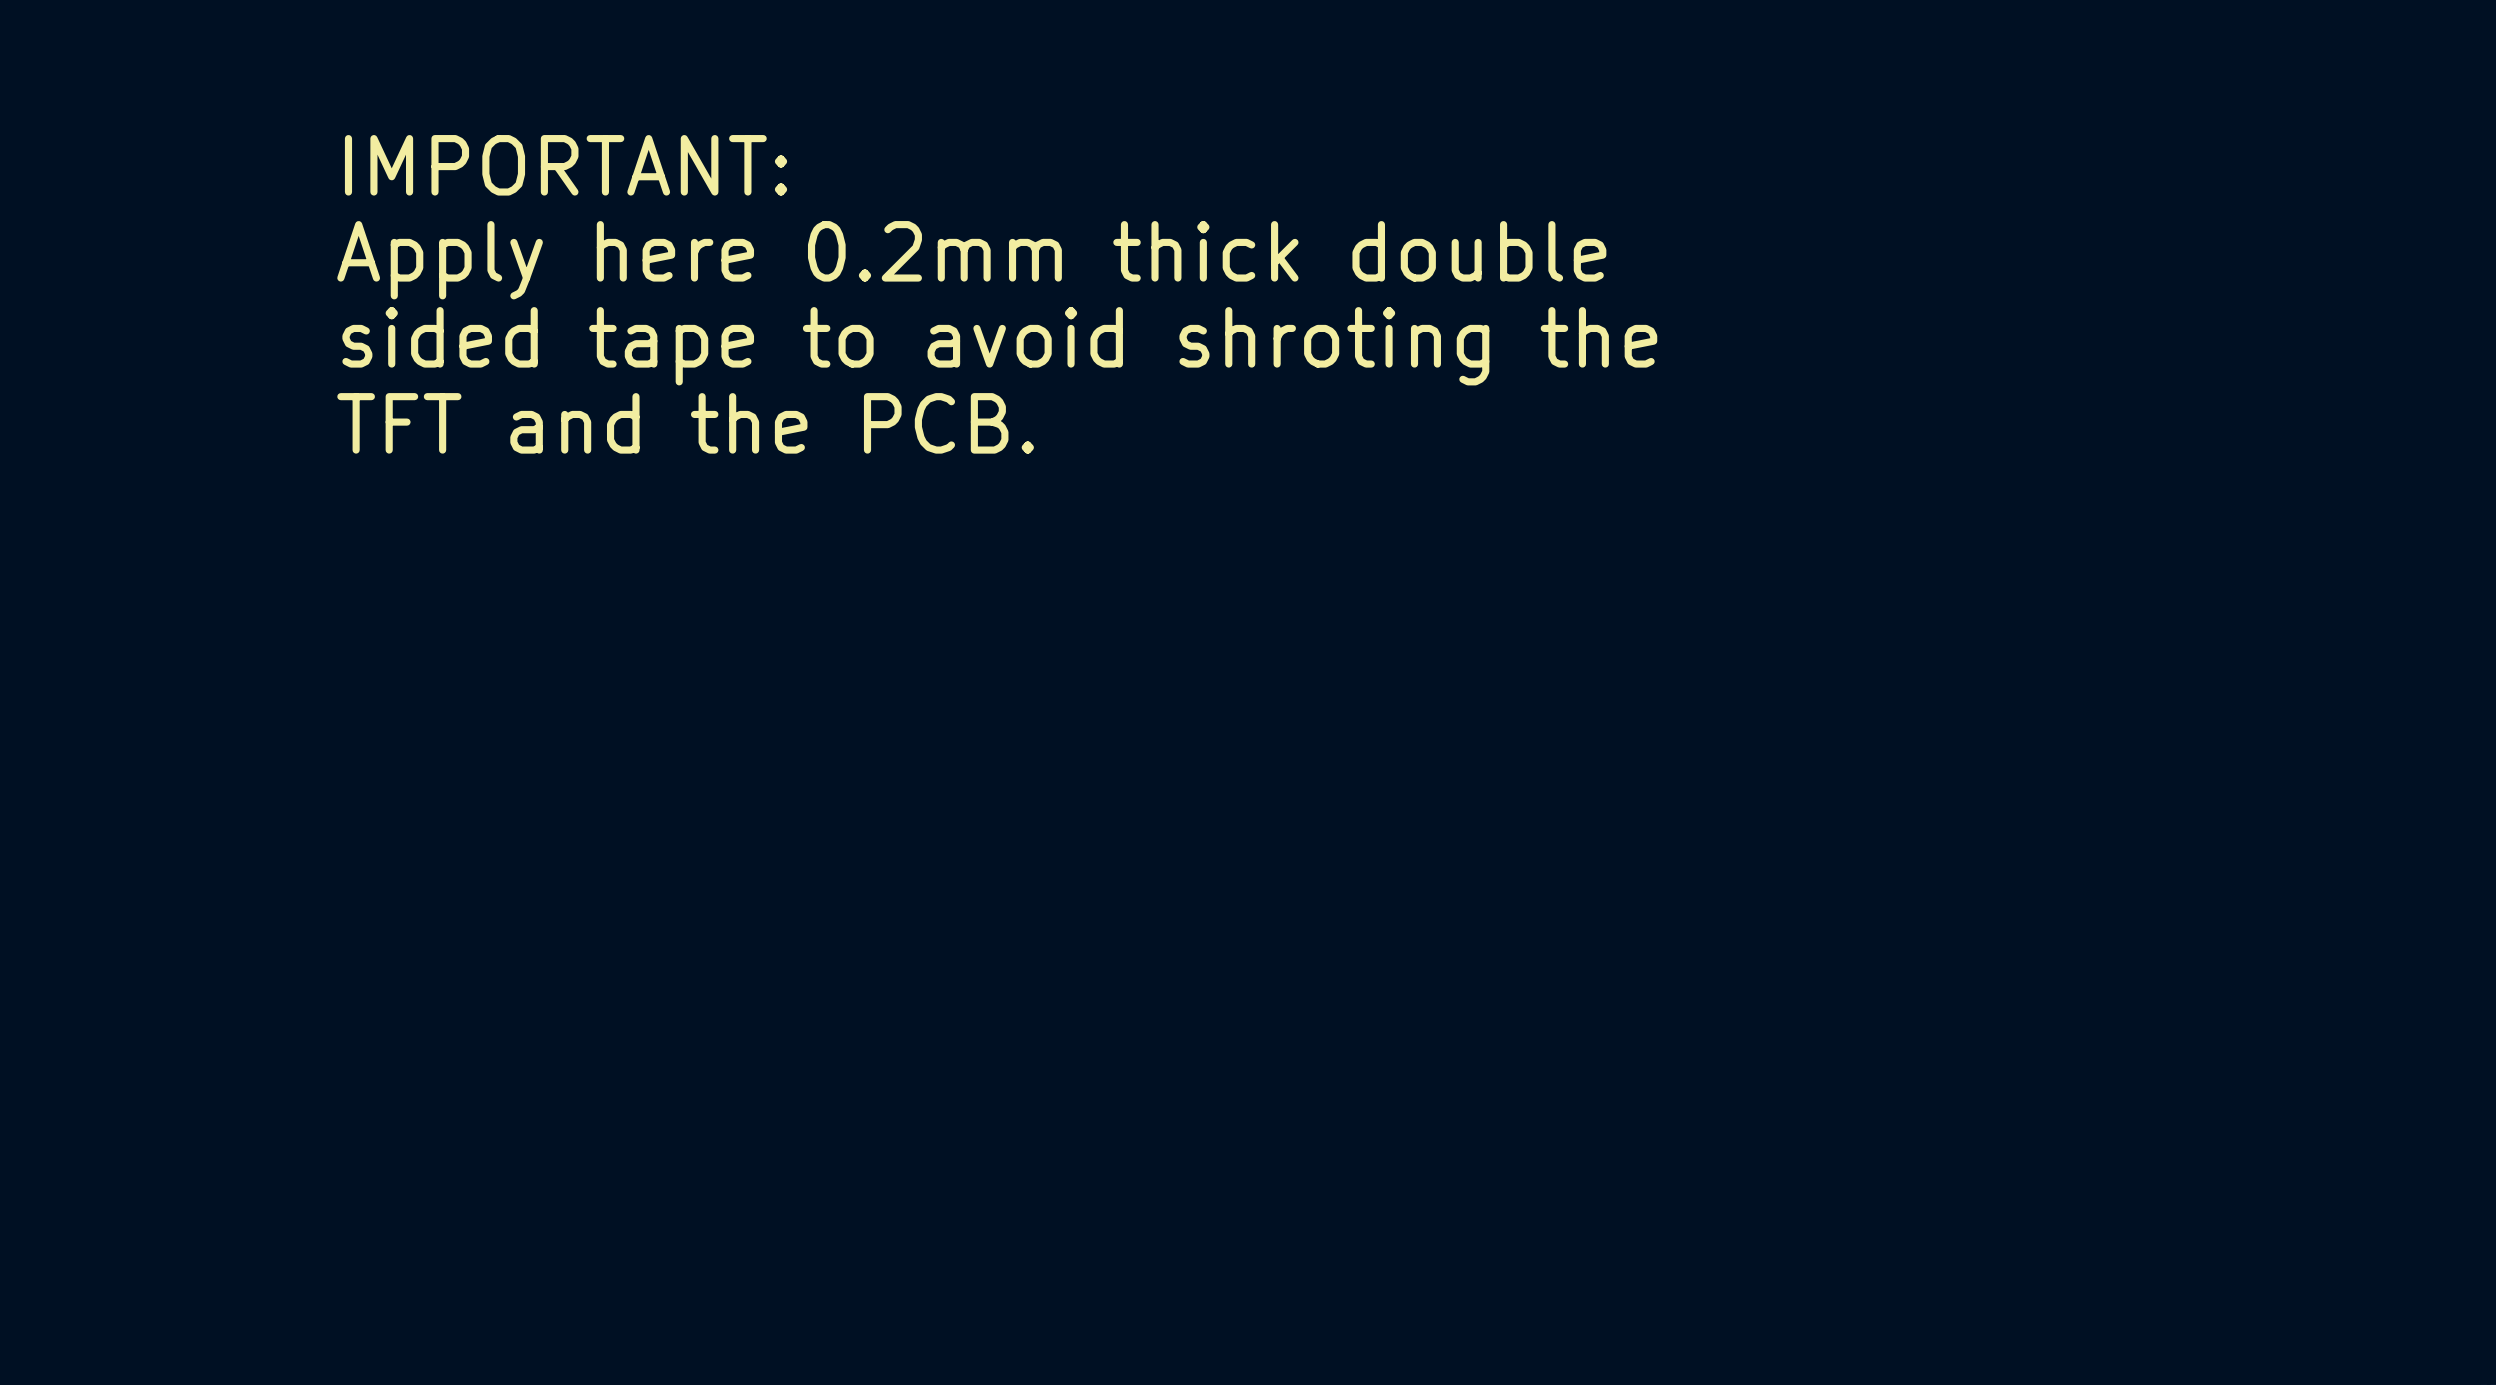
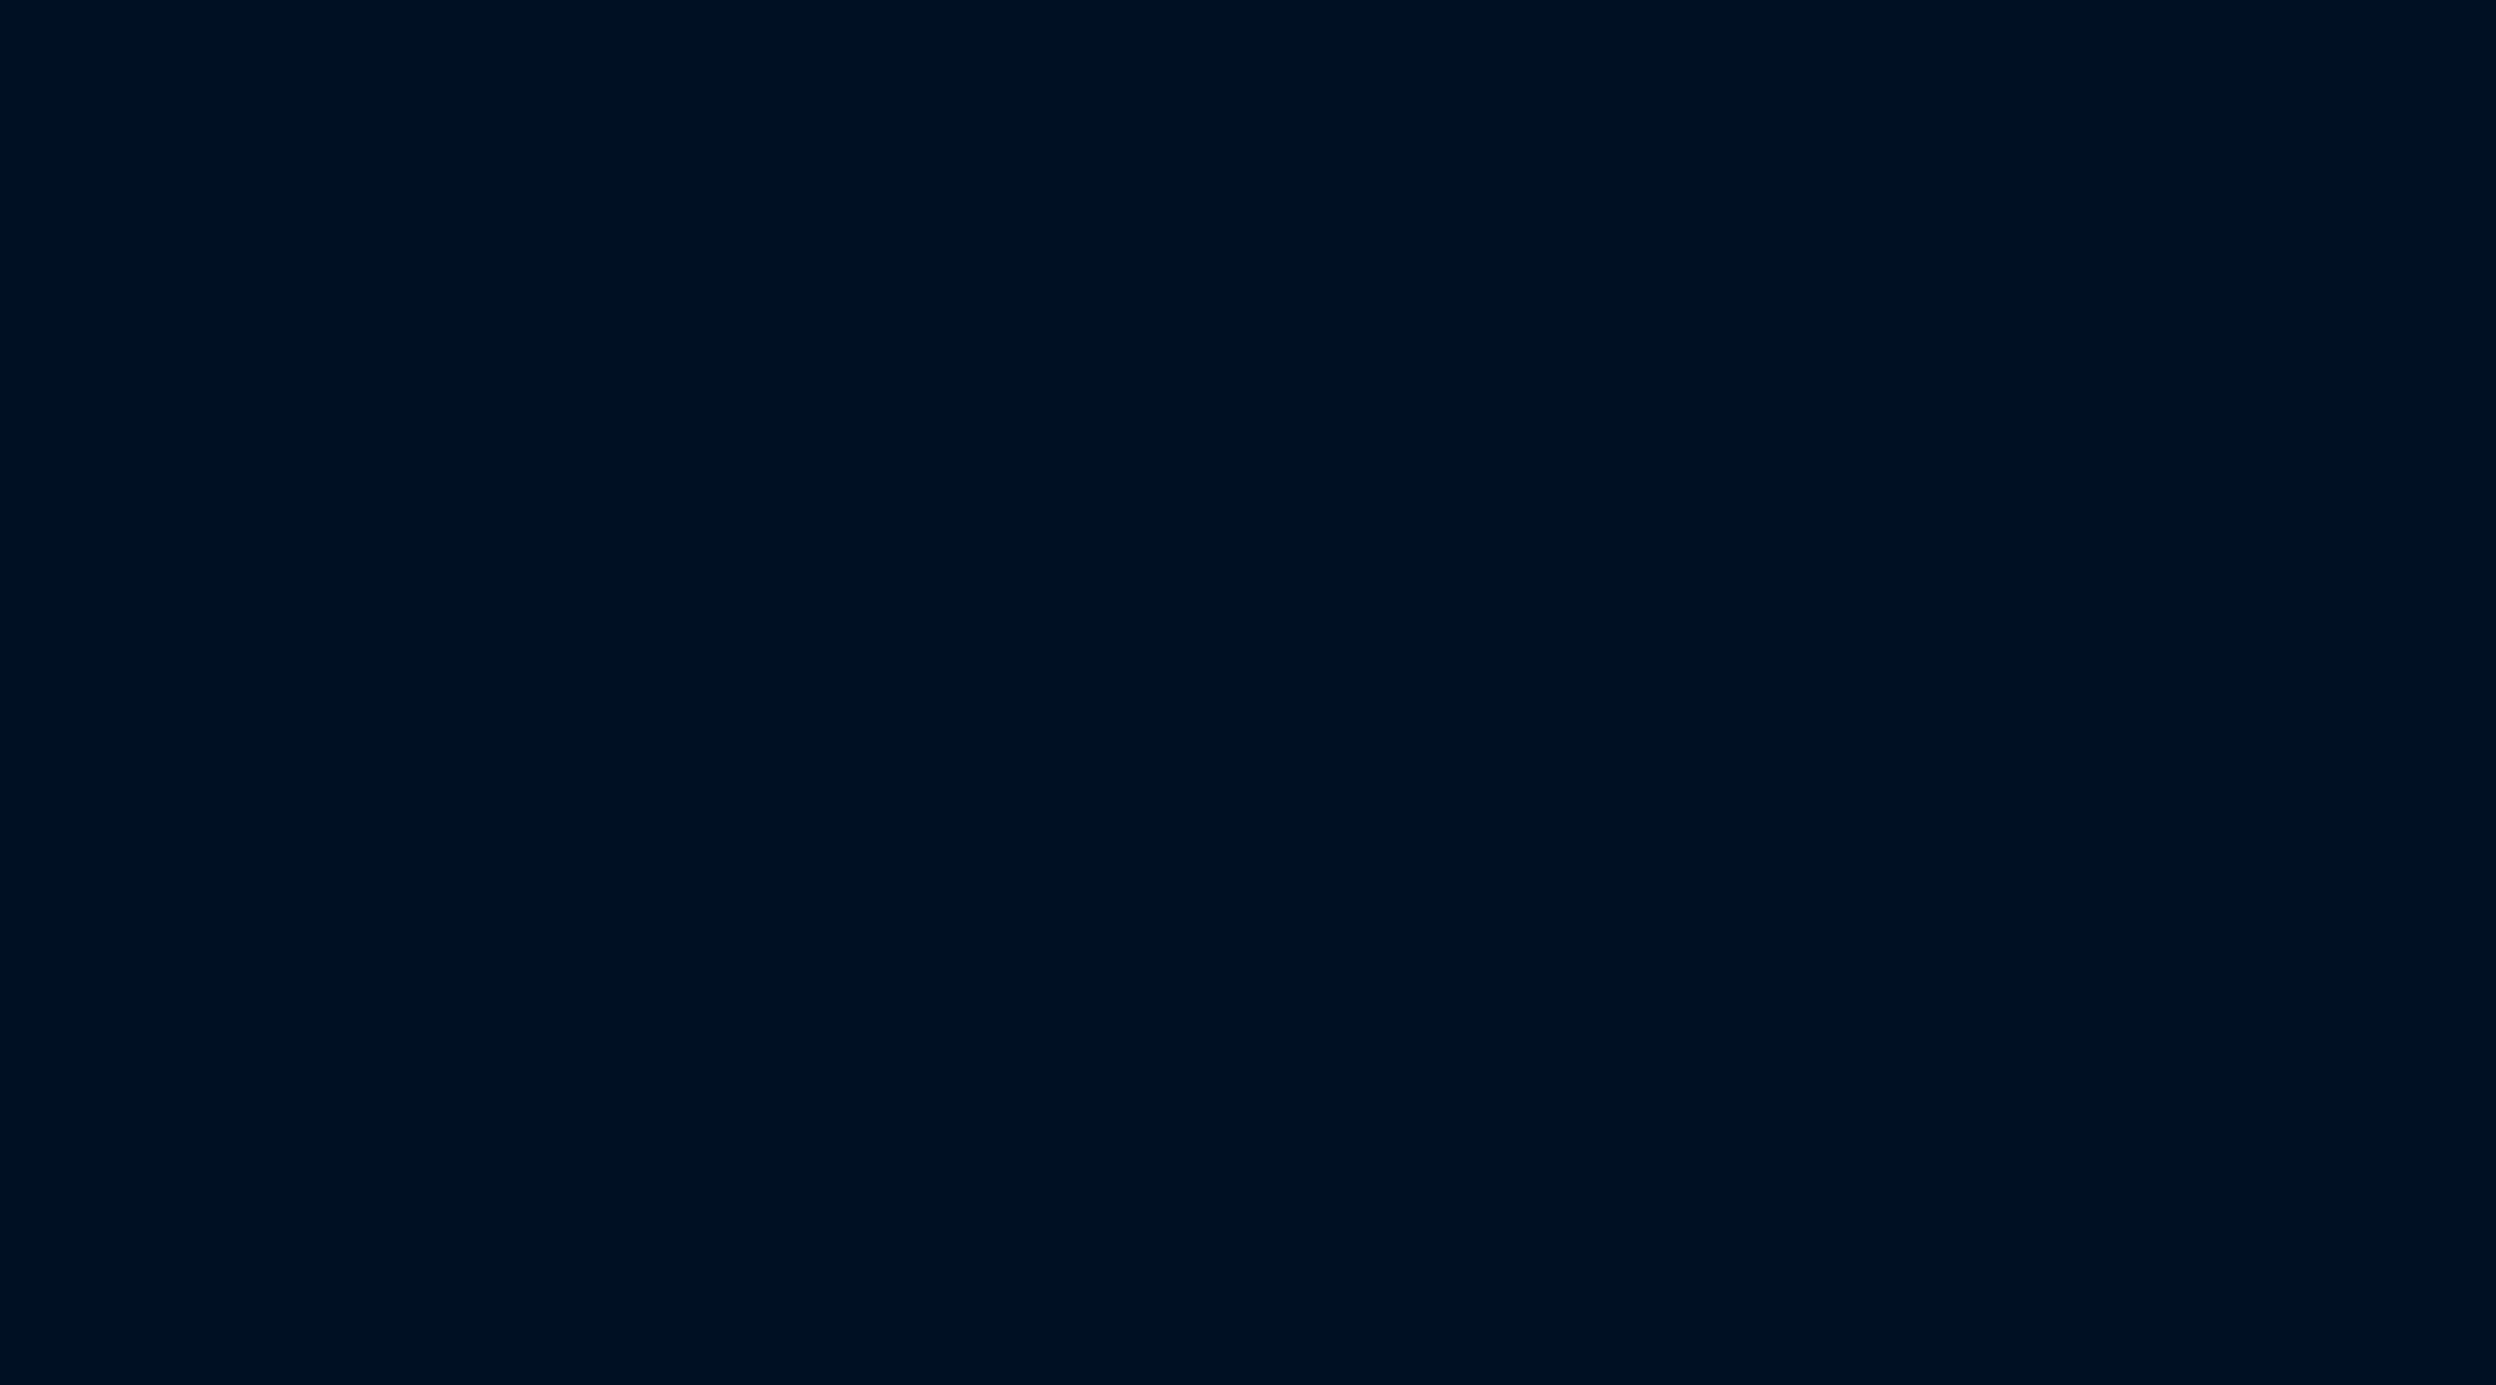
text: IMPORTANT: (566, 165) -> none
text: Apply here 0.2mm thick double (971, 260) -> none
text: sided tape to avoid shroting the (999, 346) -> none
text: TFT and the PCB. (685, 423) -> none

